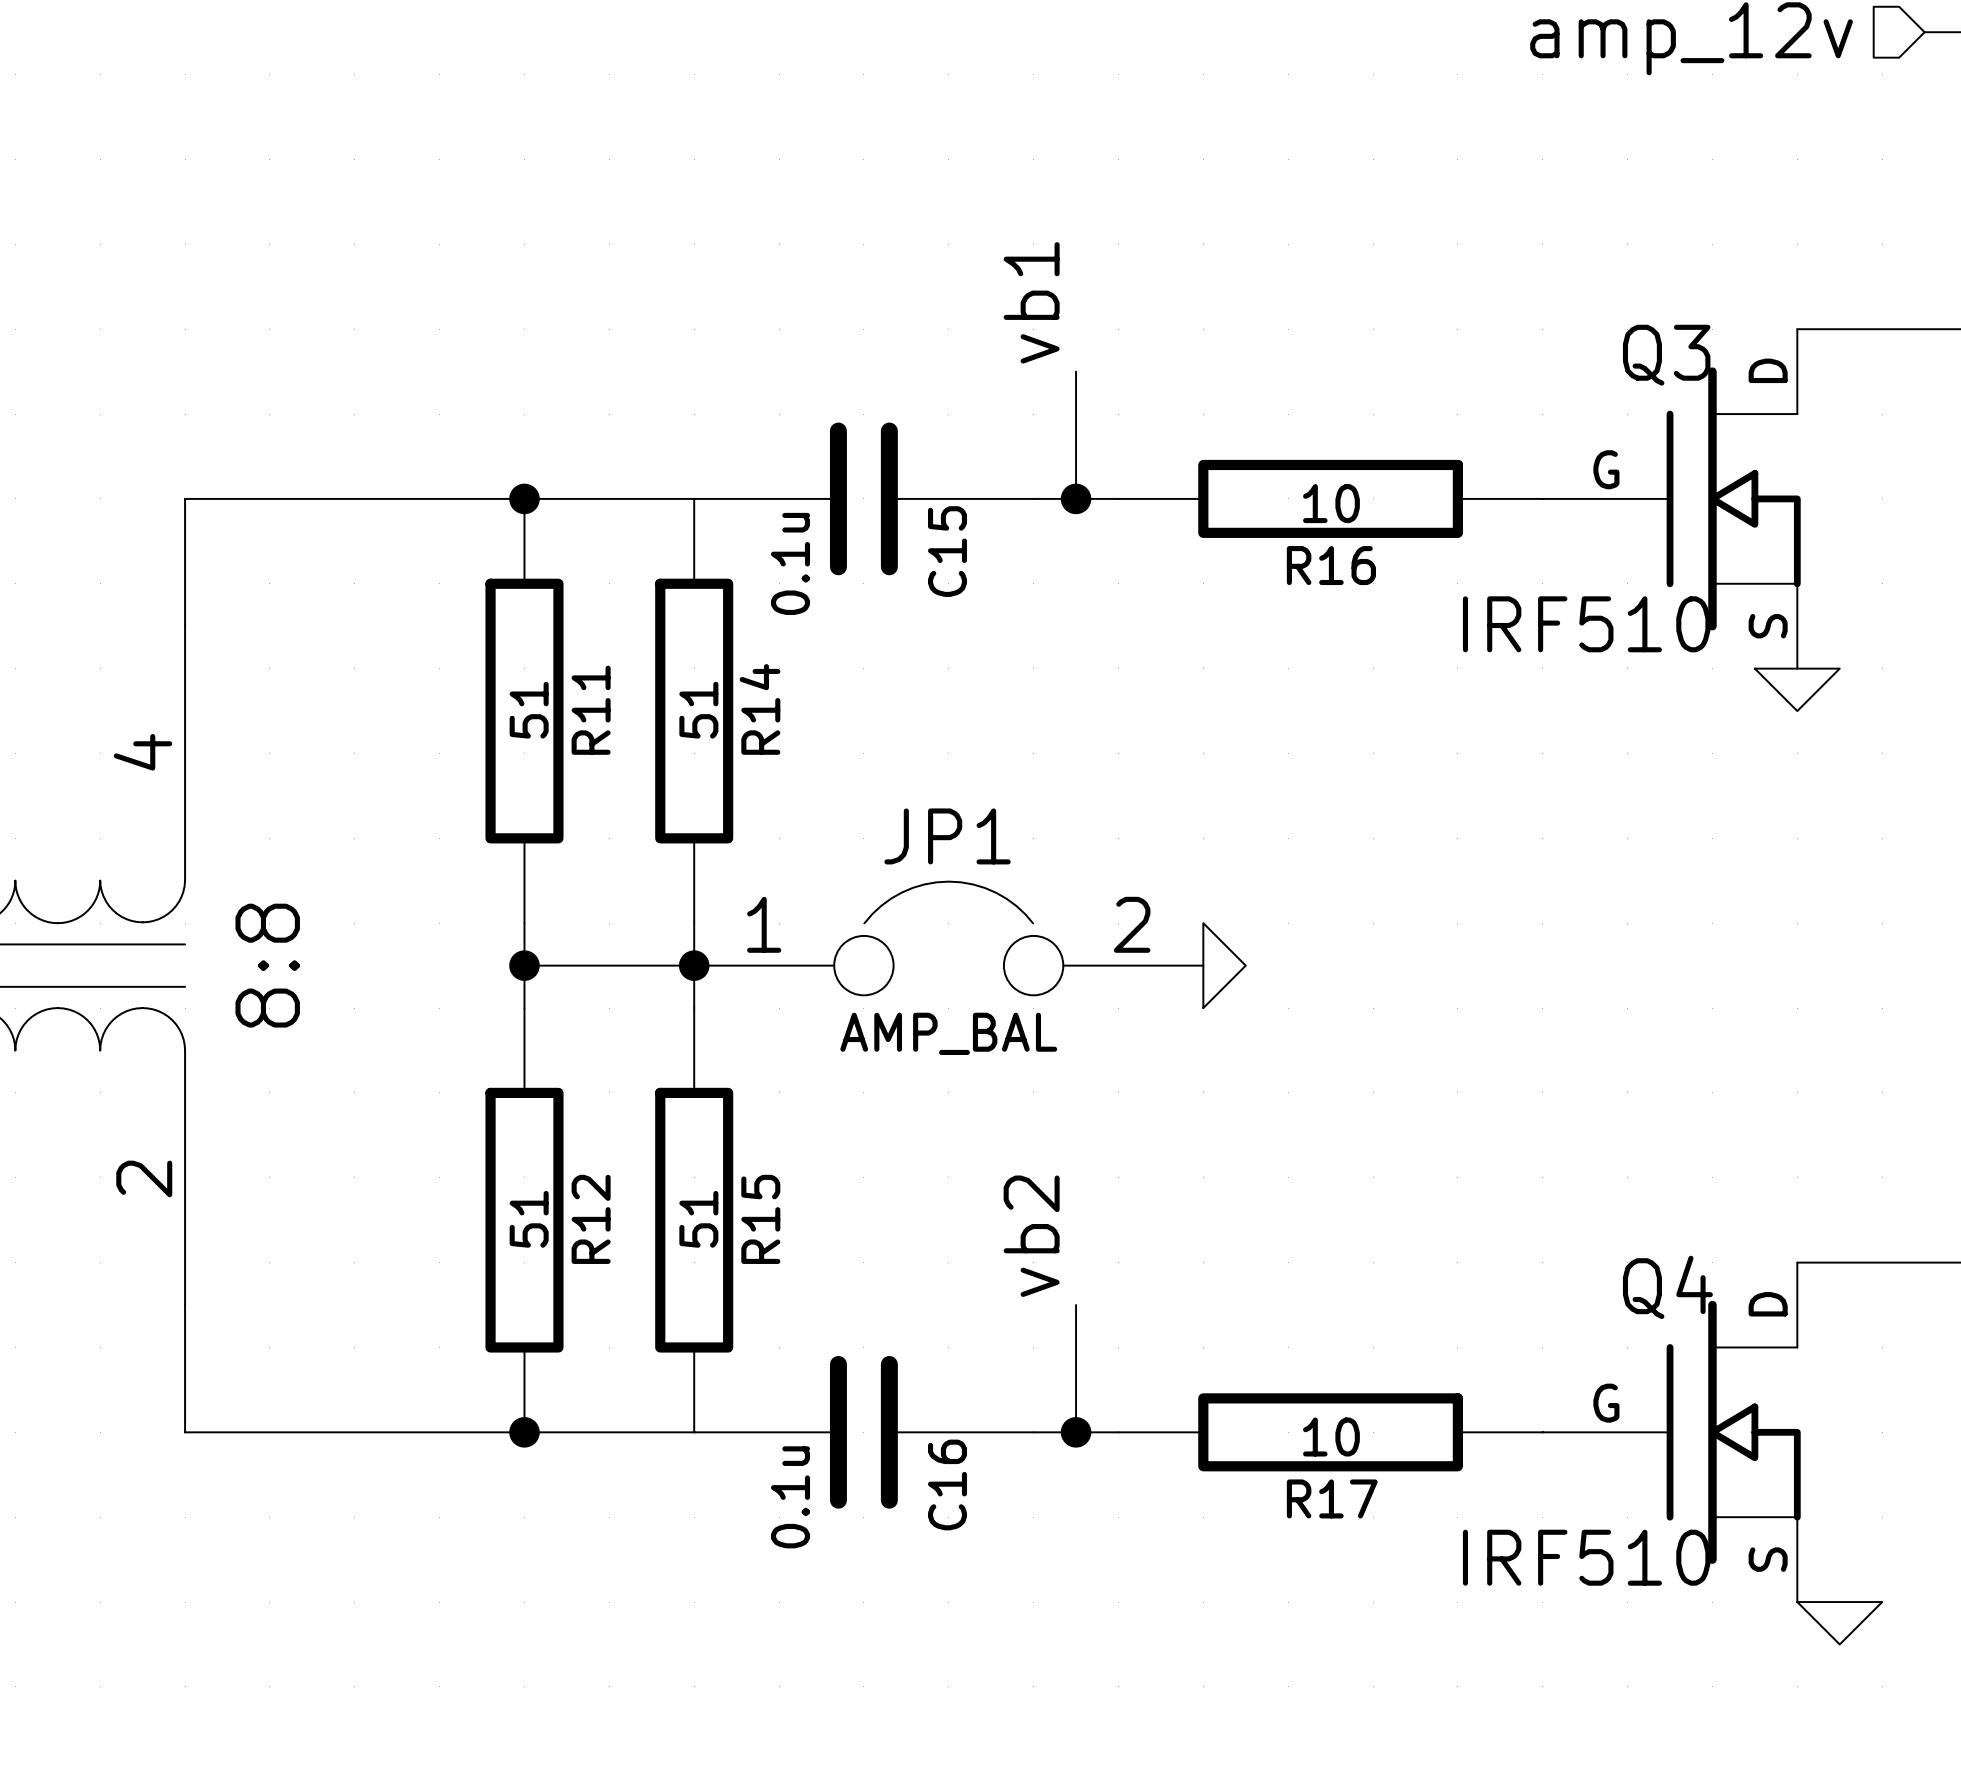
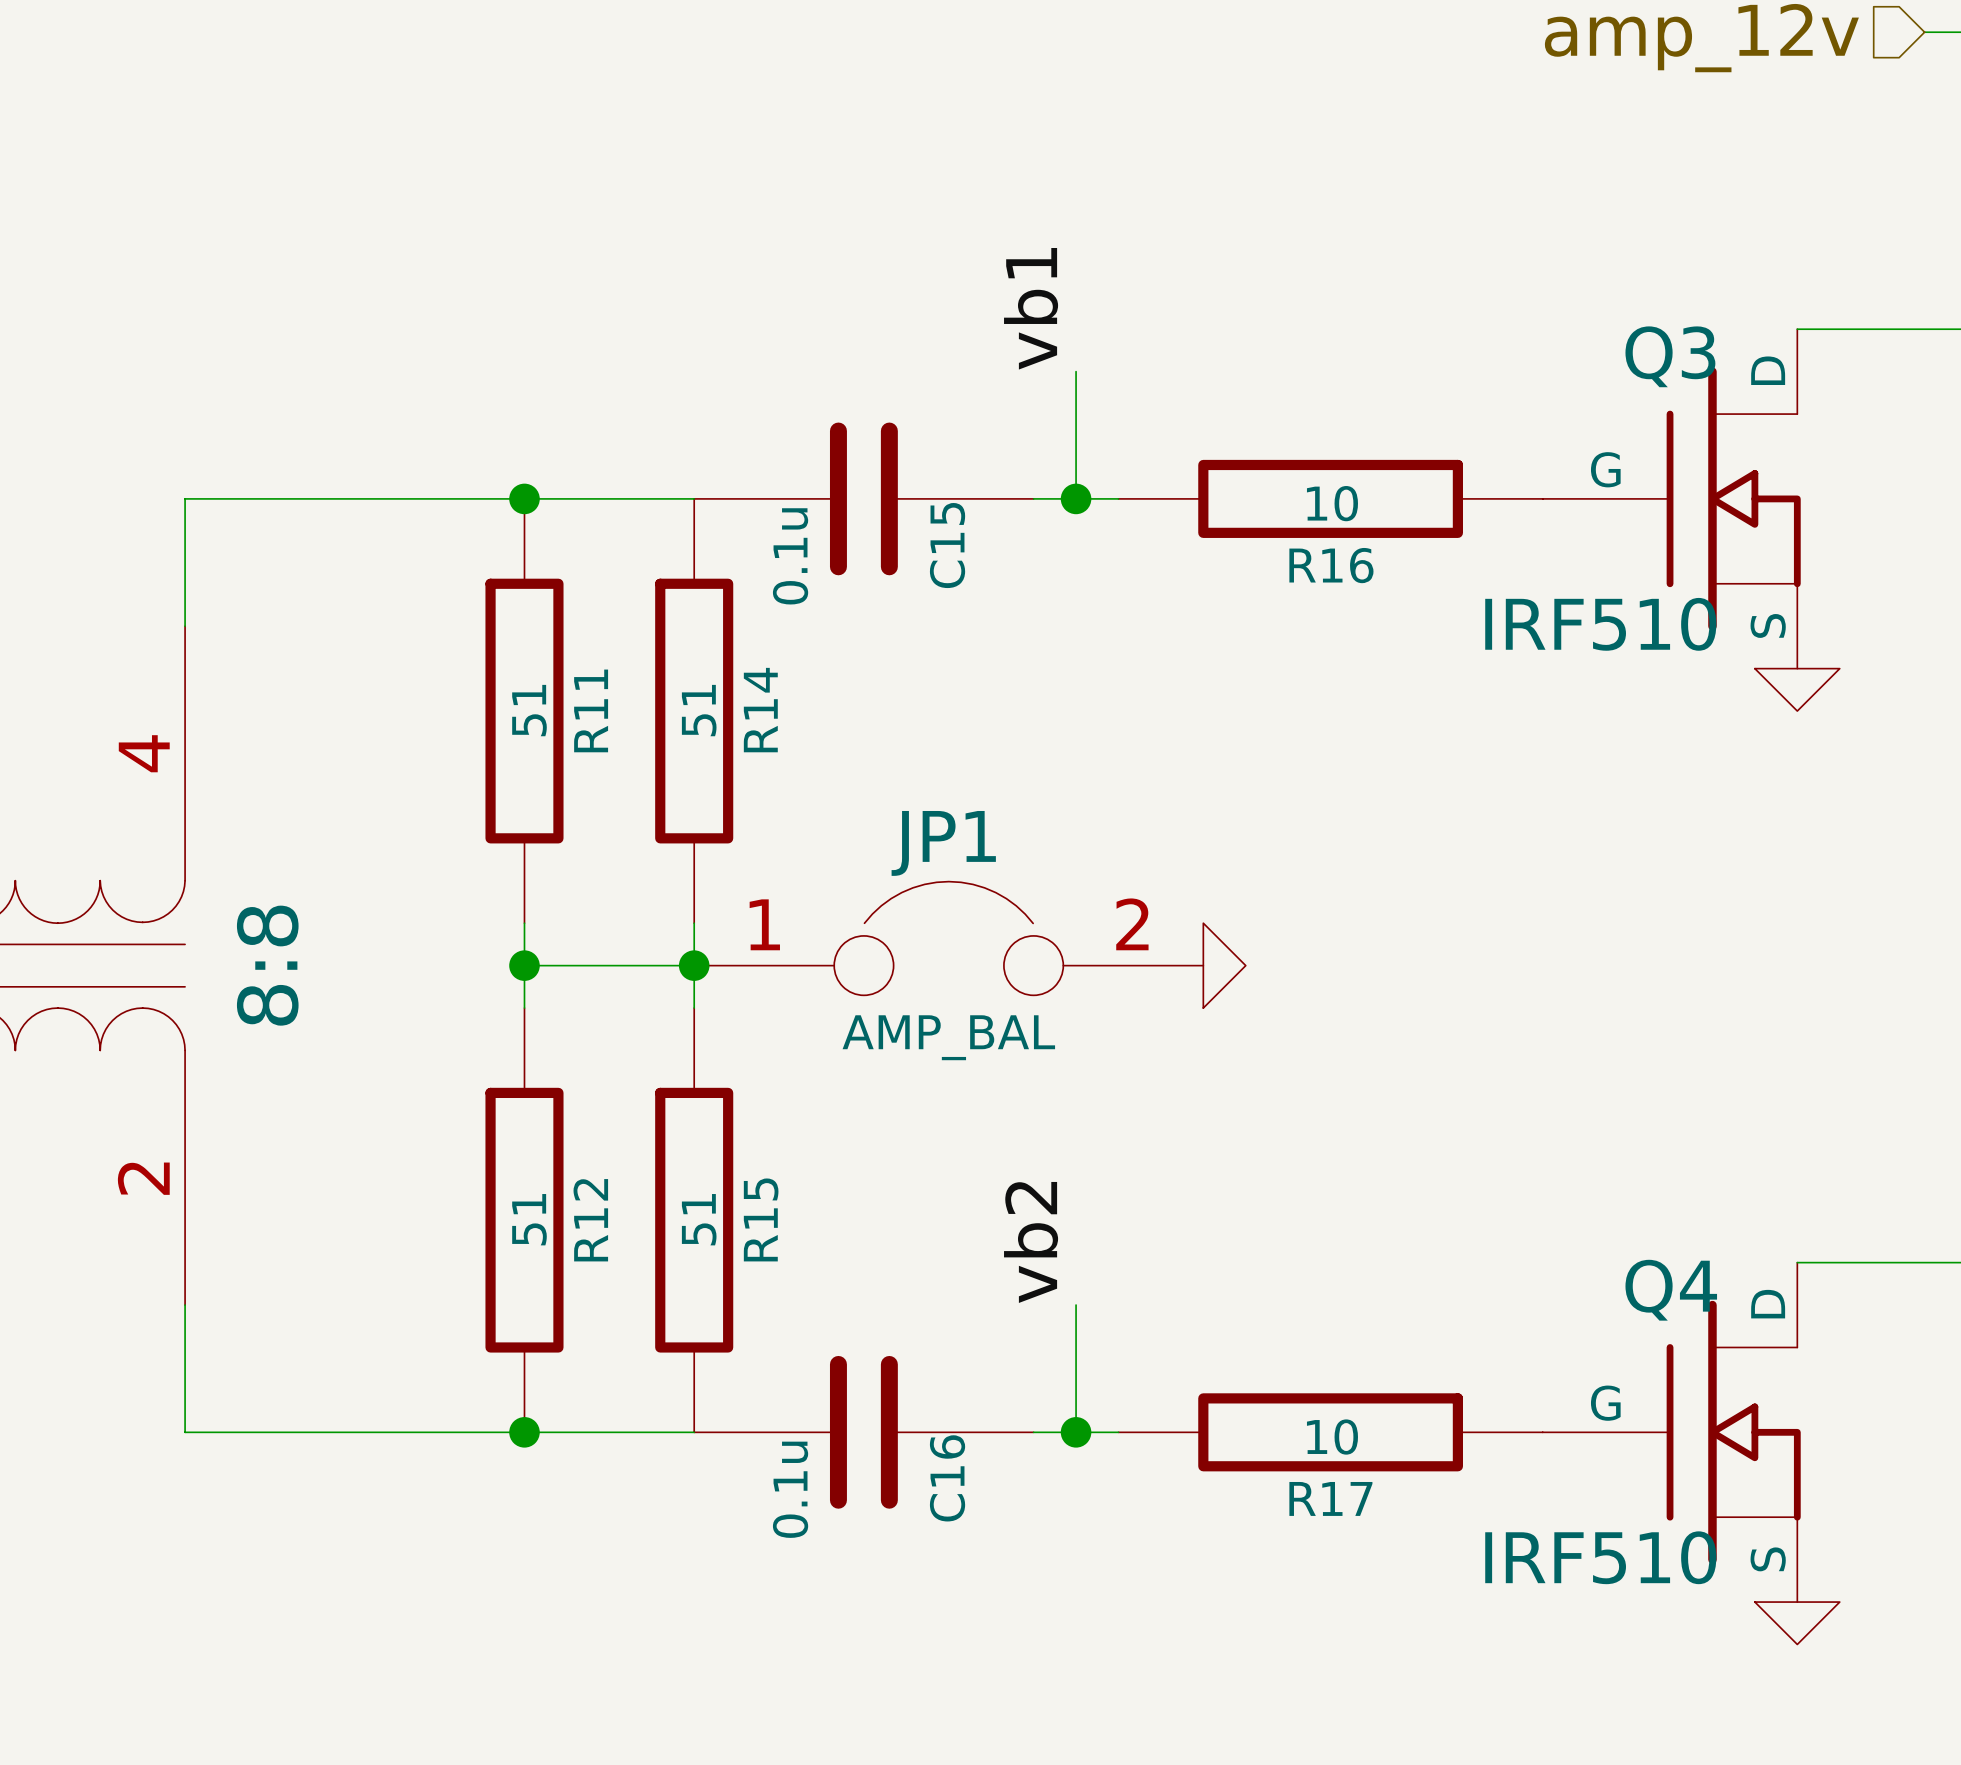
power symbol position: (1839, 1623) -> (1797, 1623)

